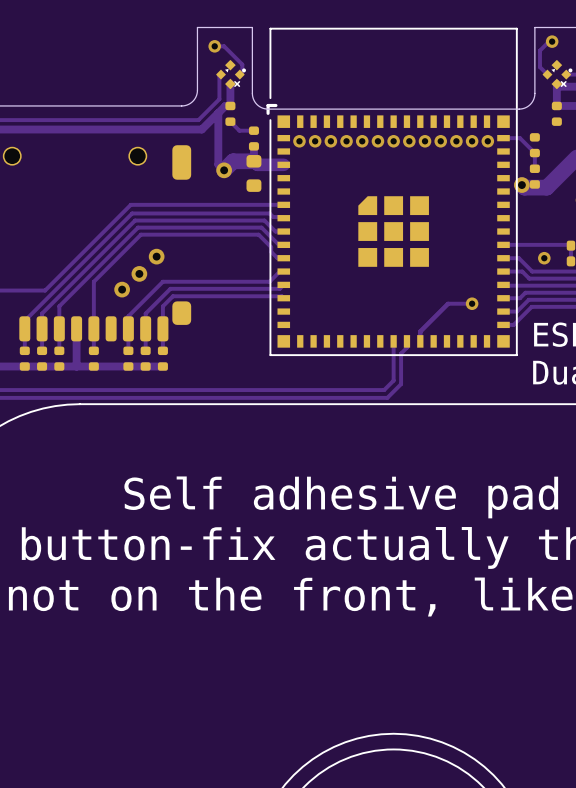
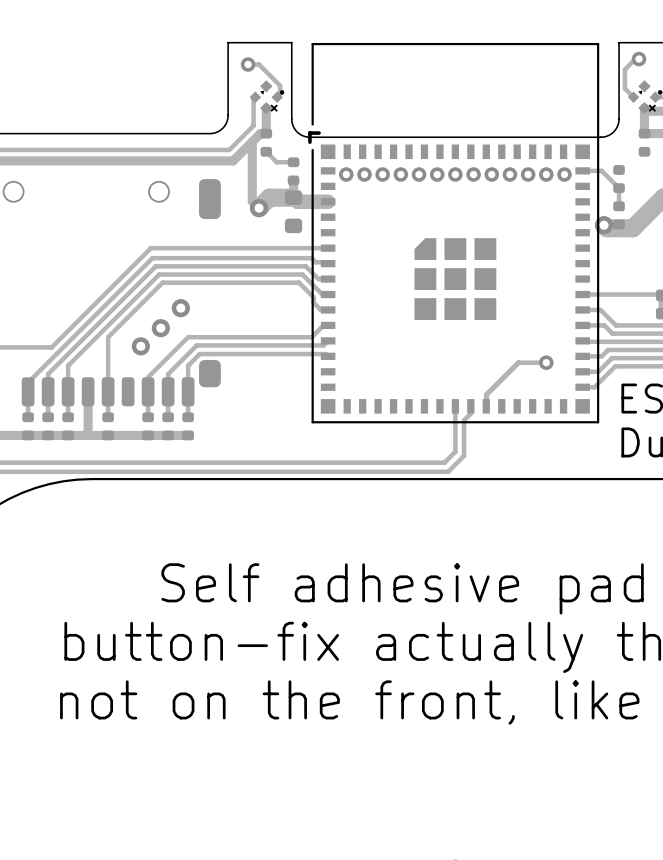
via: (544, 258) -> none

